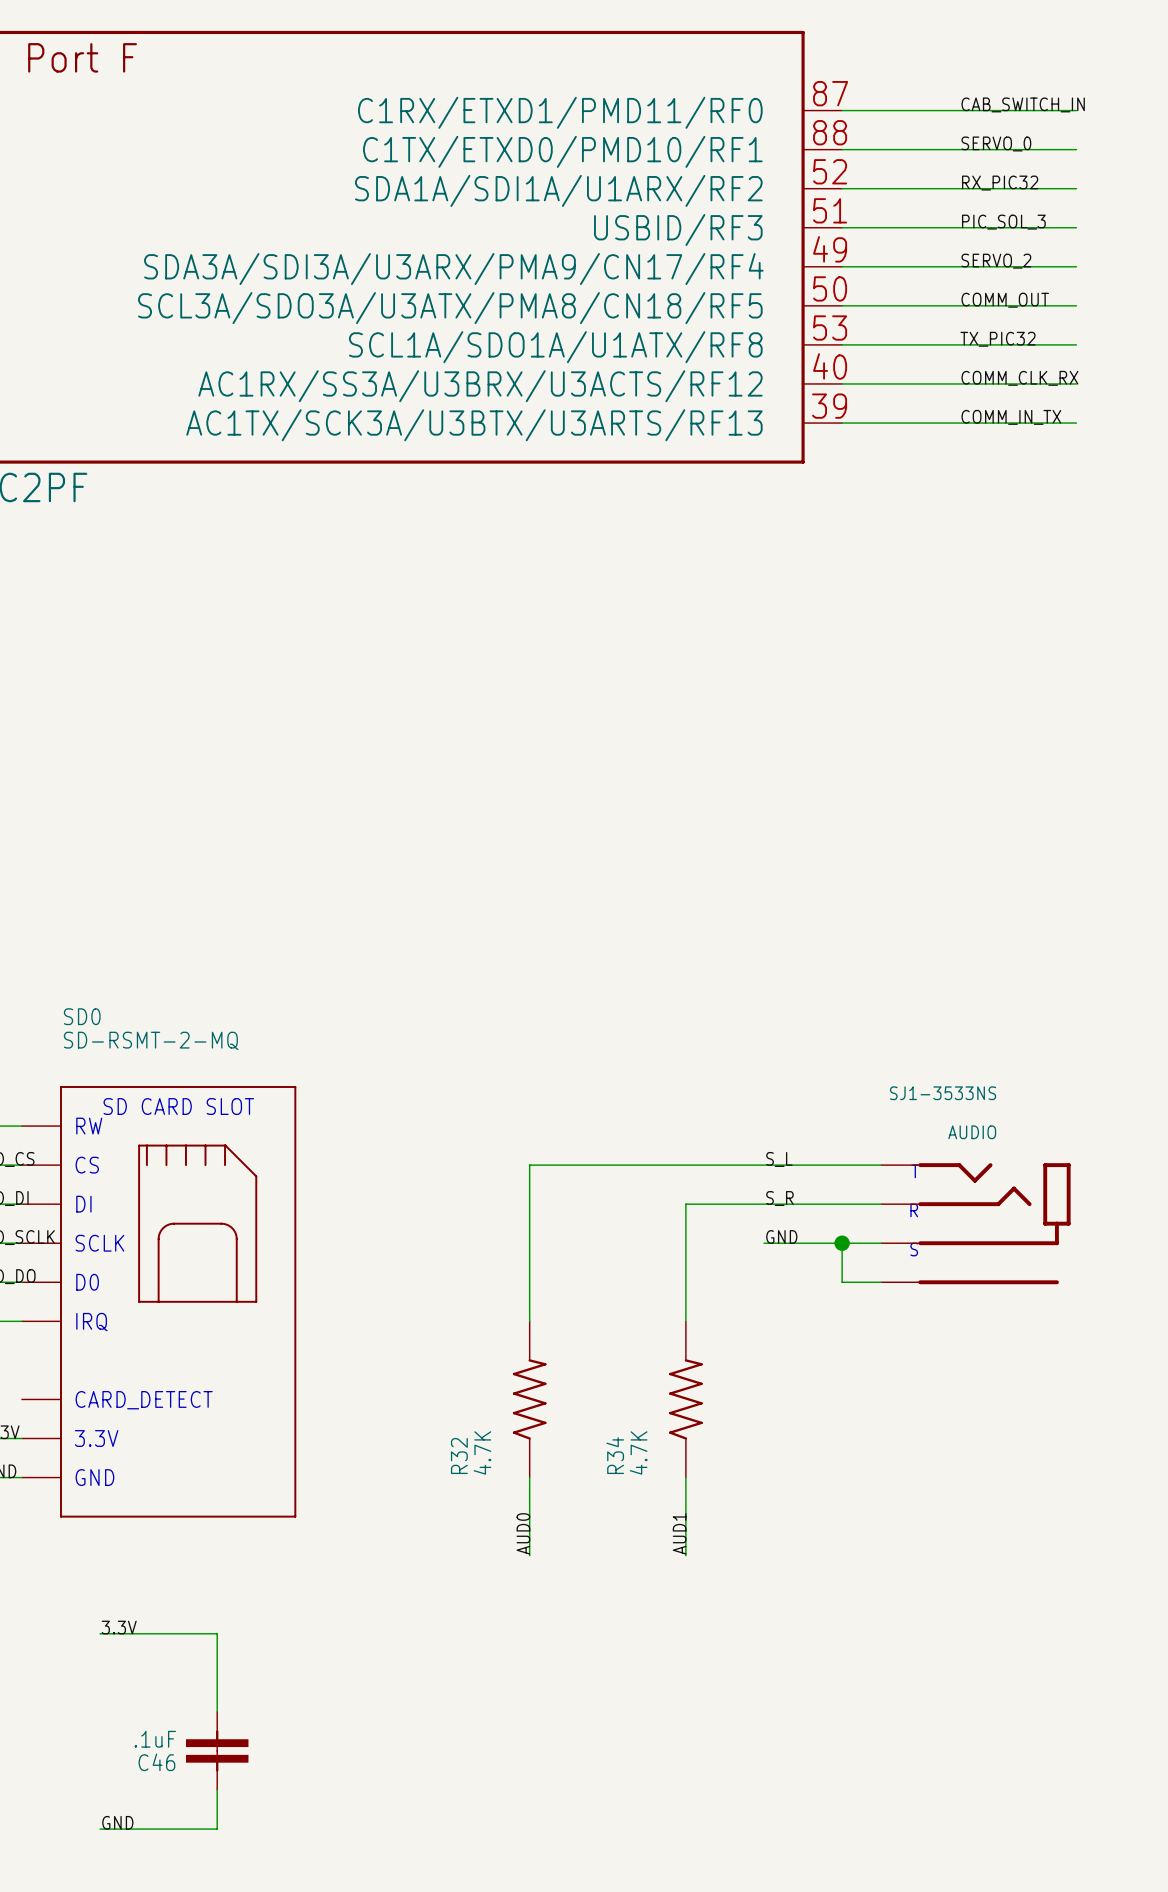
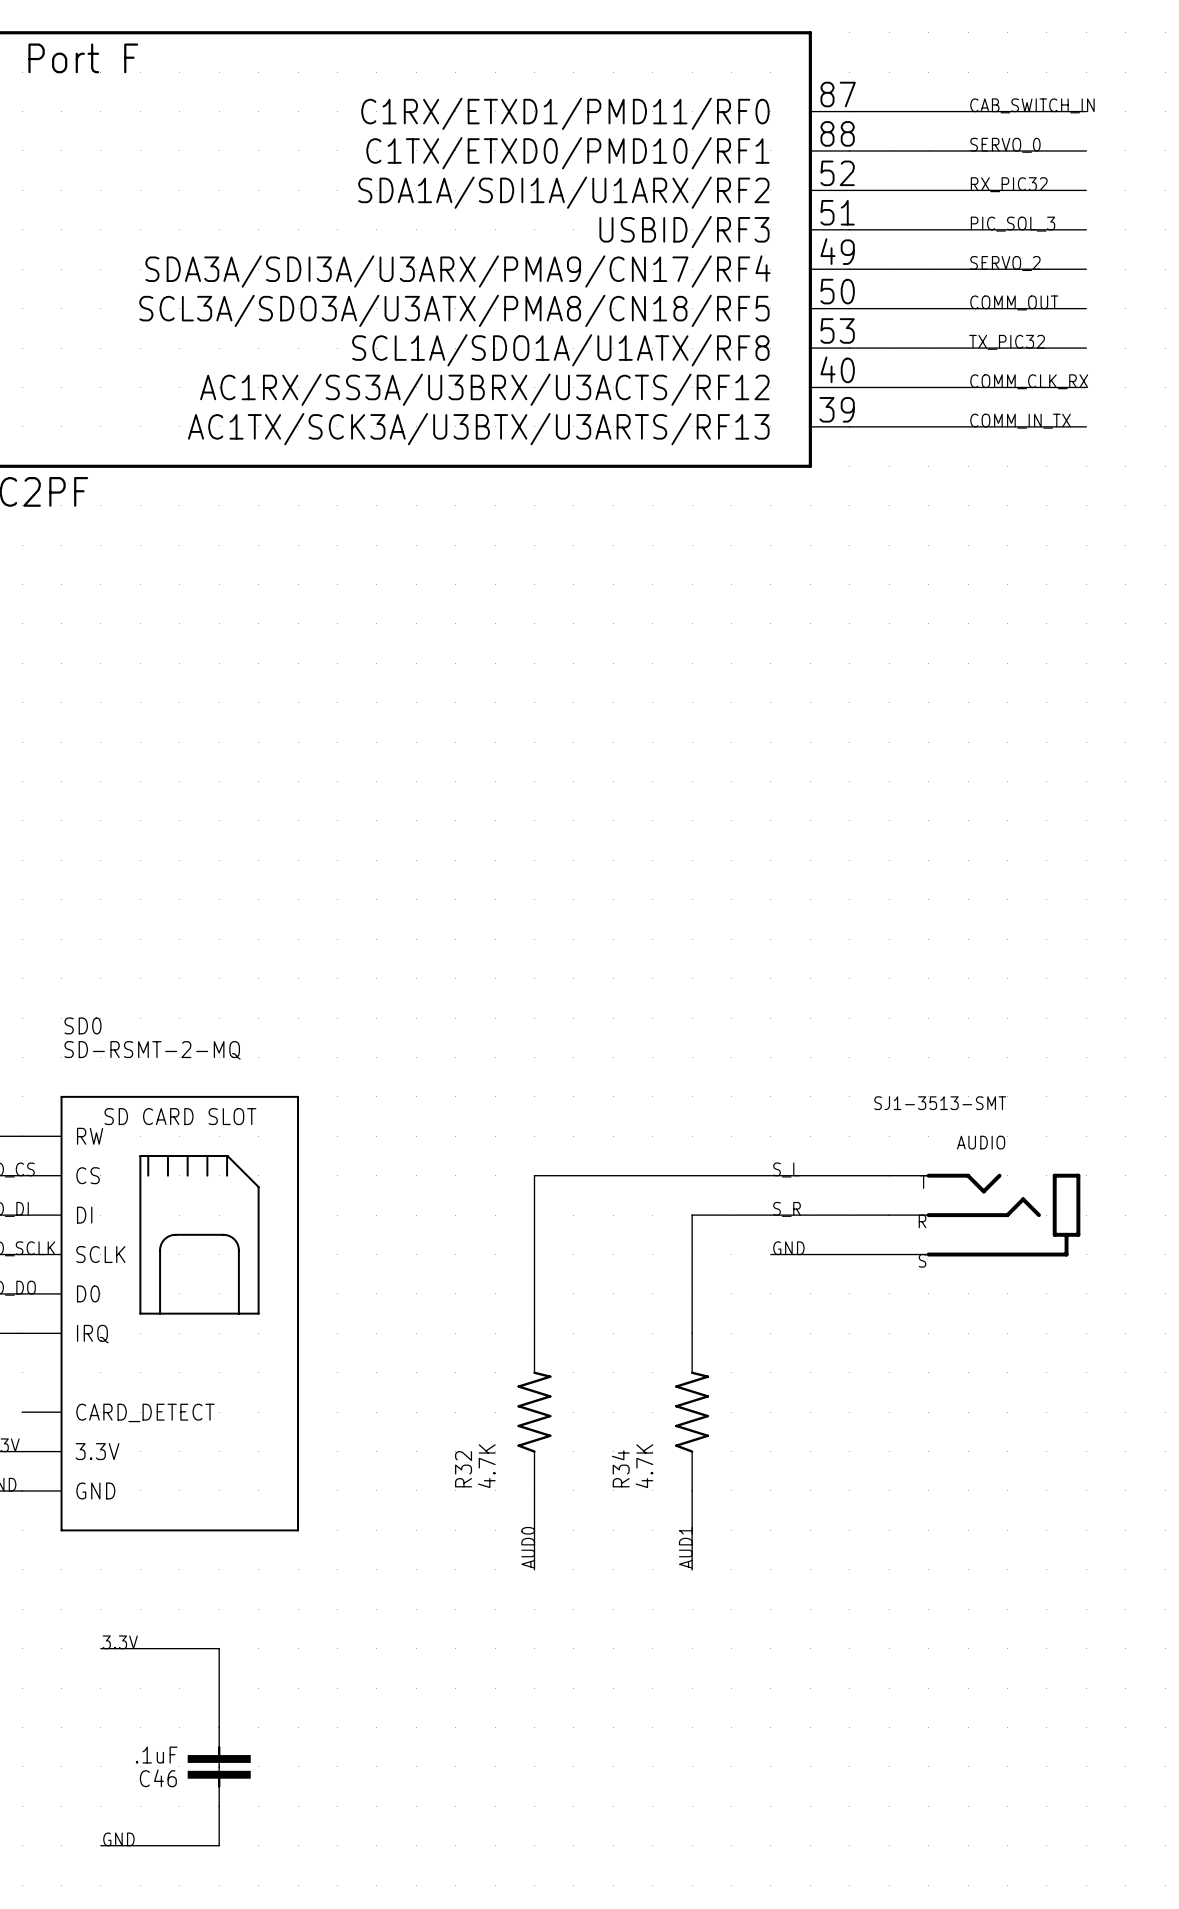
AUDIO: none -> SJ1-3513-SMT (984, 1215)
AUDIO: SJ1-3533NS (975, 1223) -> none
wire: (842, 1243) (842, 1282) (881, 1282) -> none
junction: (842, 1243) -> none

